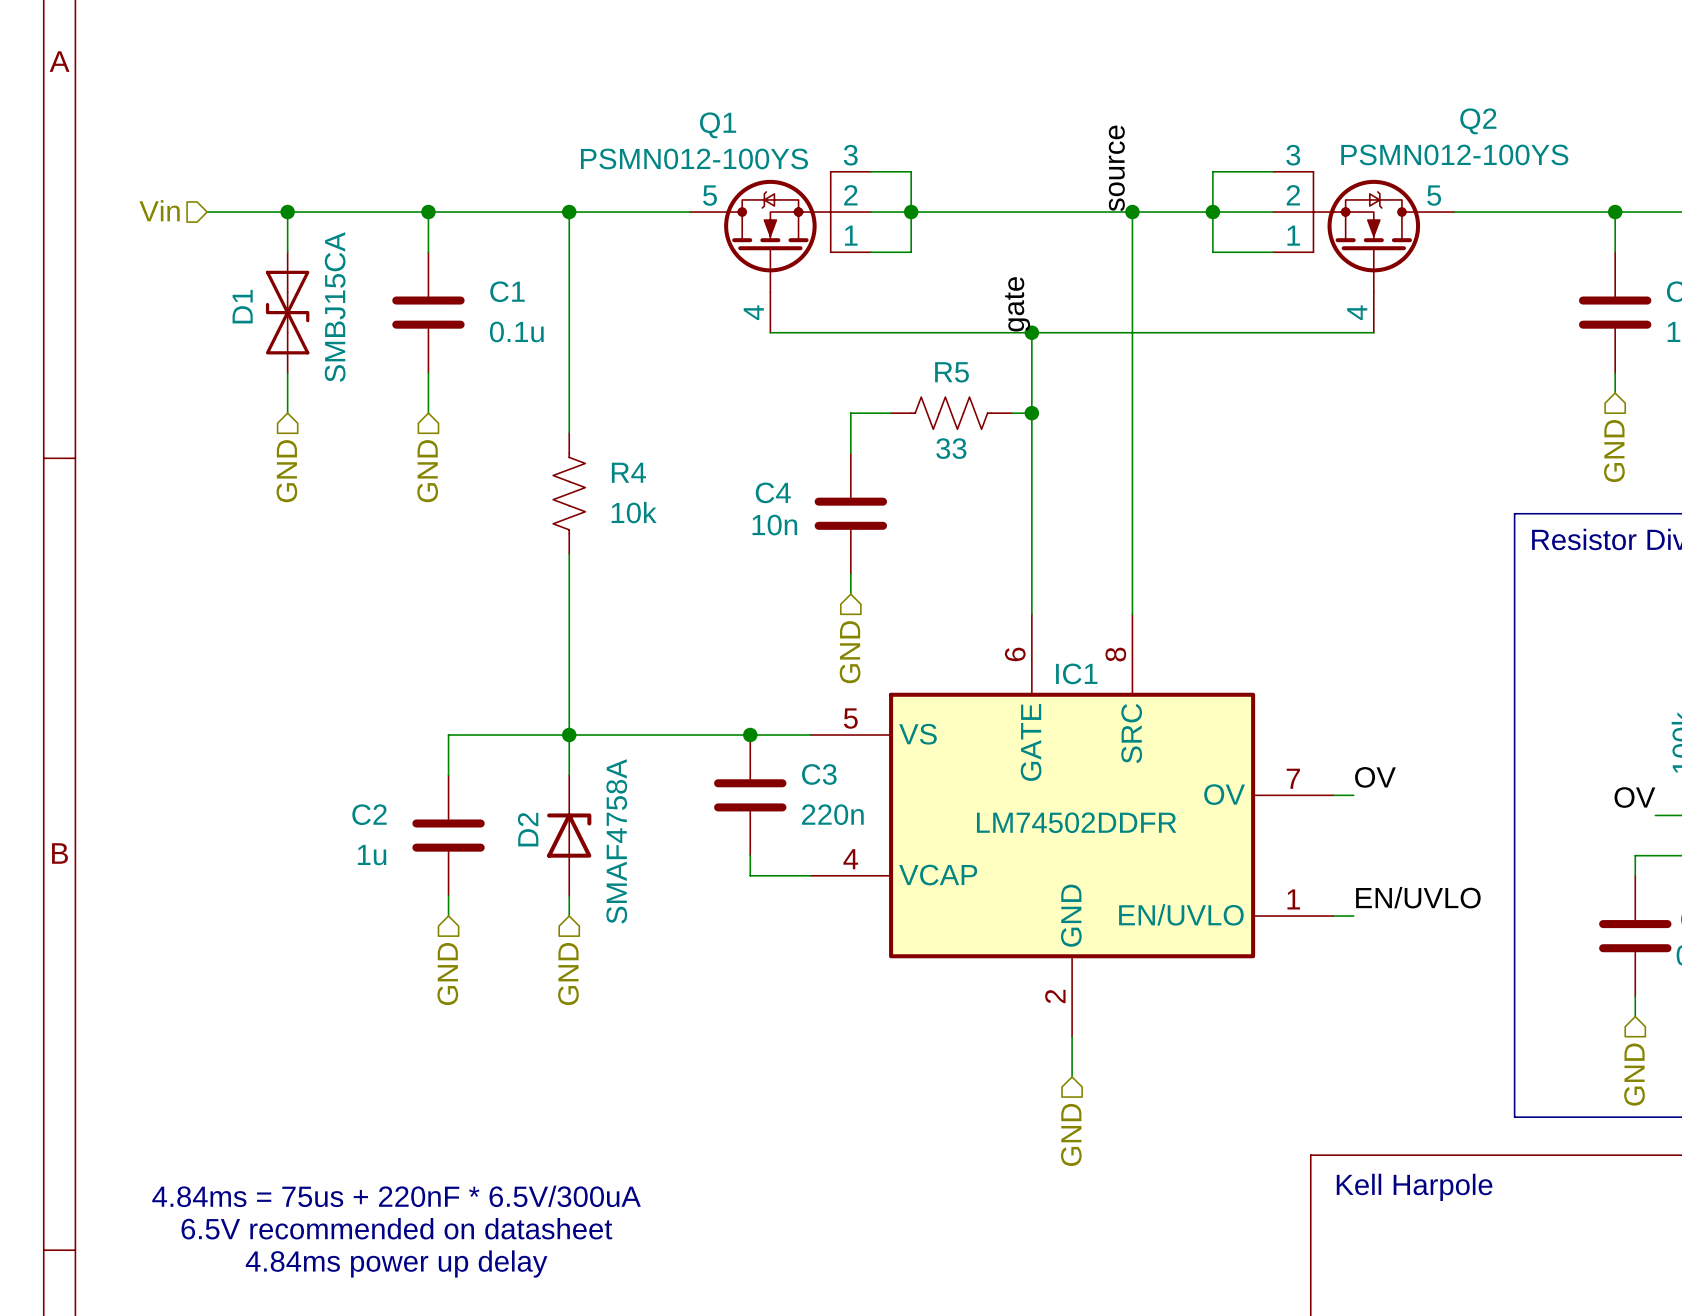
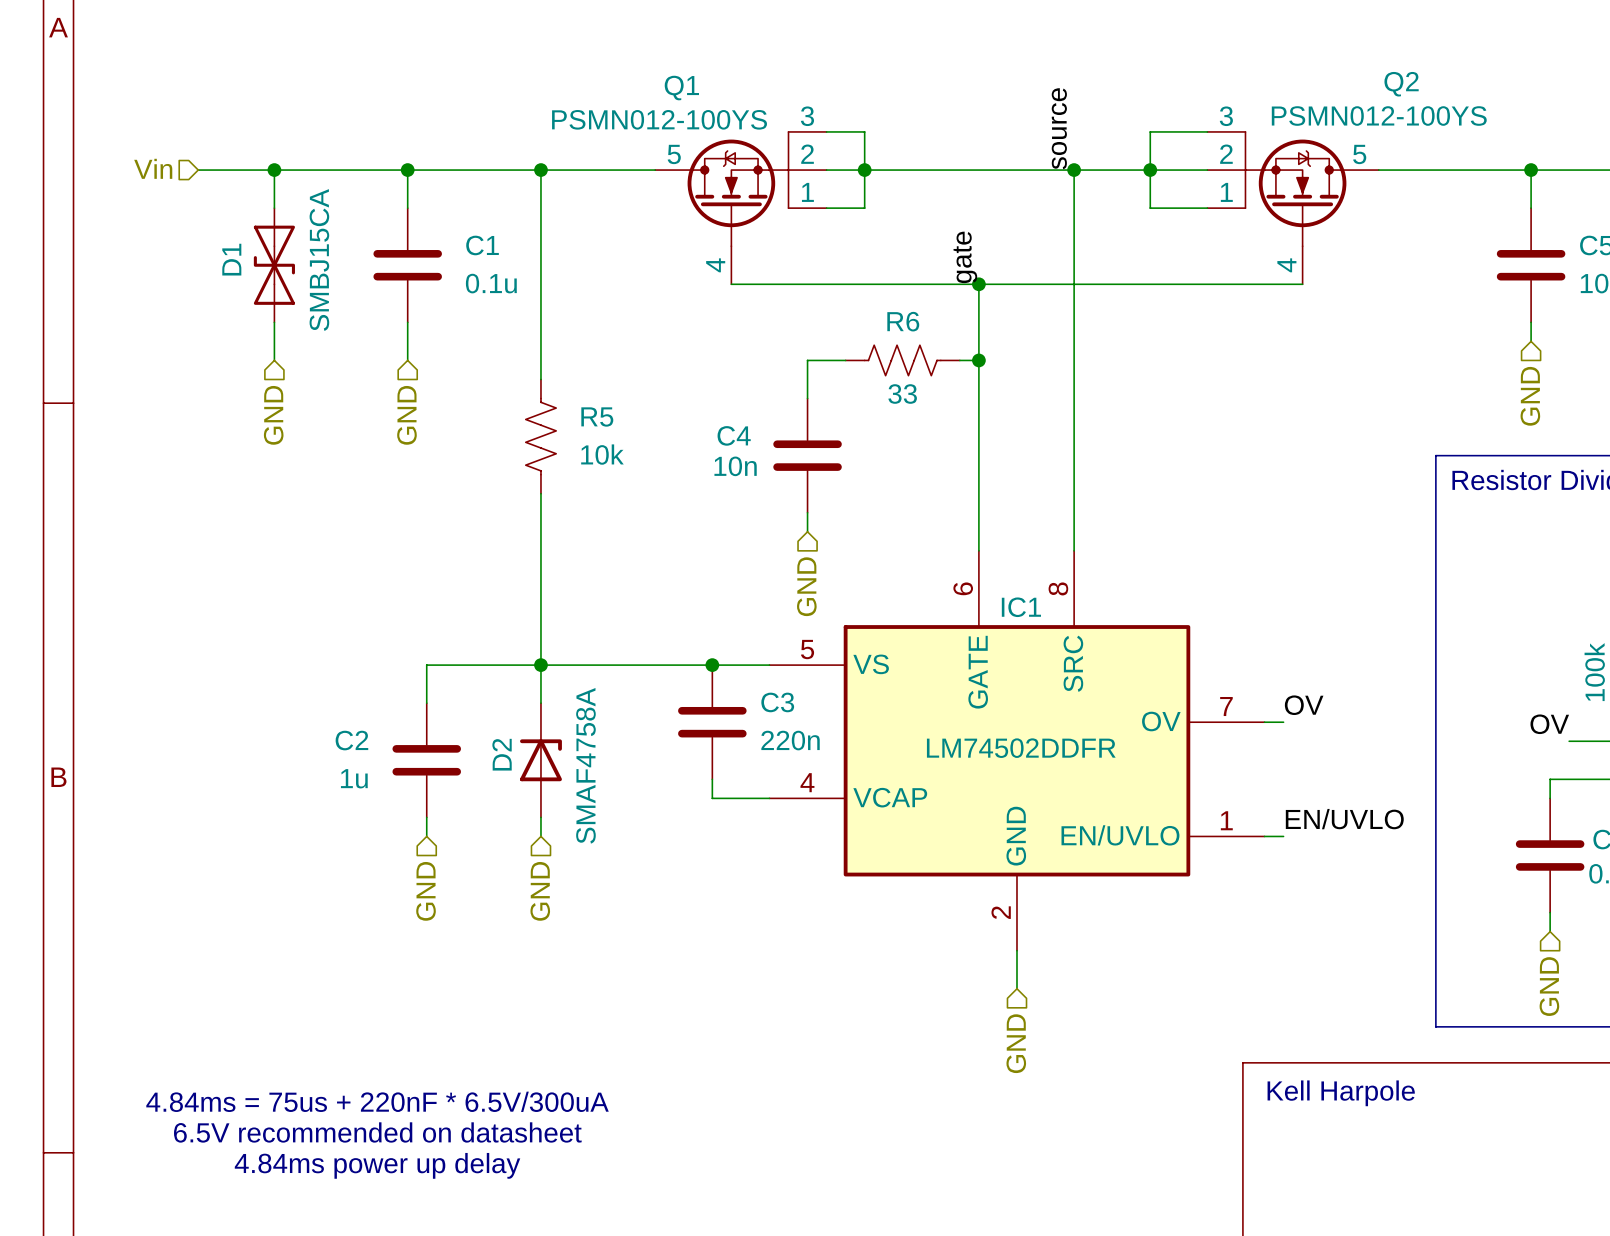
R5 name: R5 (951, 372) -> R6 (903, 321)
R4 name: R4 (628, 472) -> R5 (597, 416)

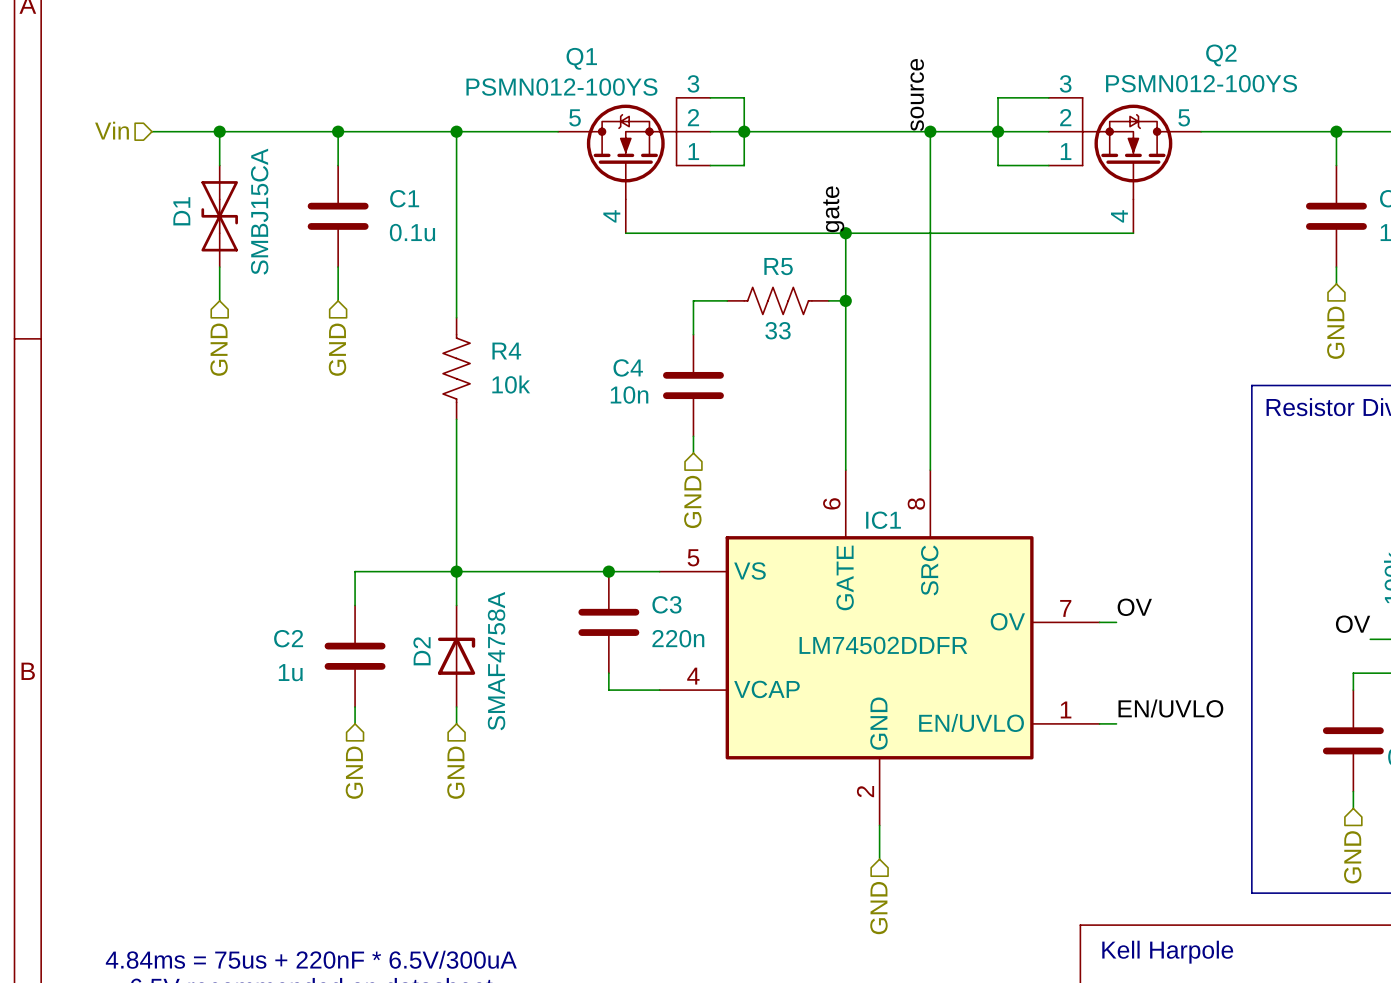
R6 name: R6 (903, 321) -> R5 (778, 266)
R5 name: R5 (597, 416) -> R4 (506, 351)

